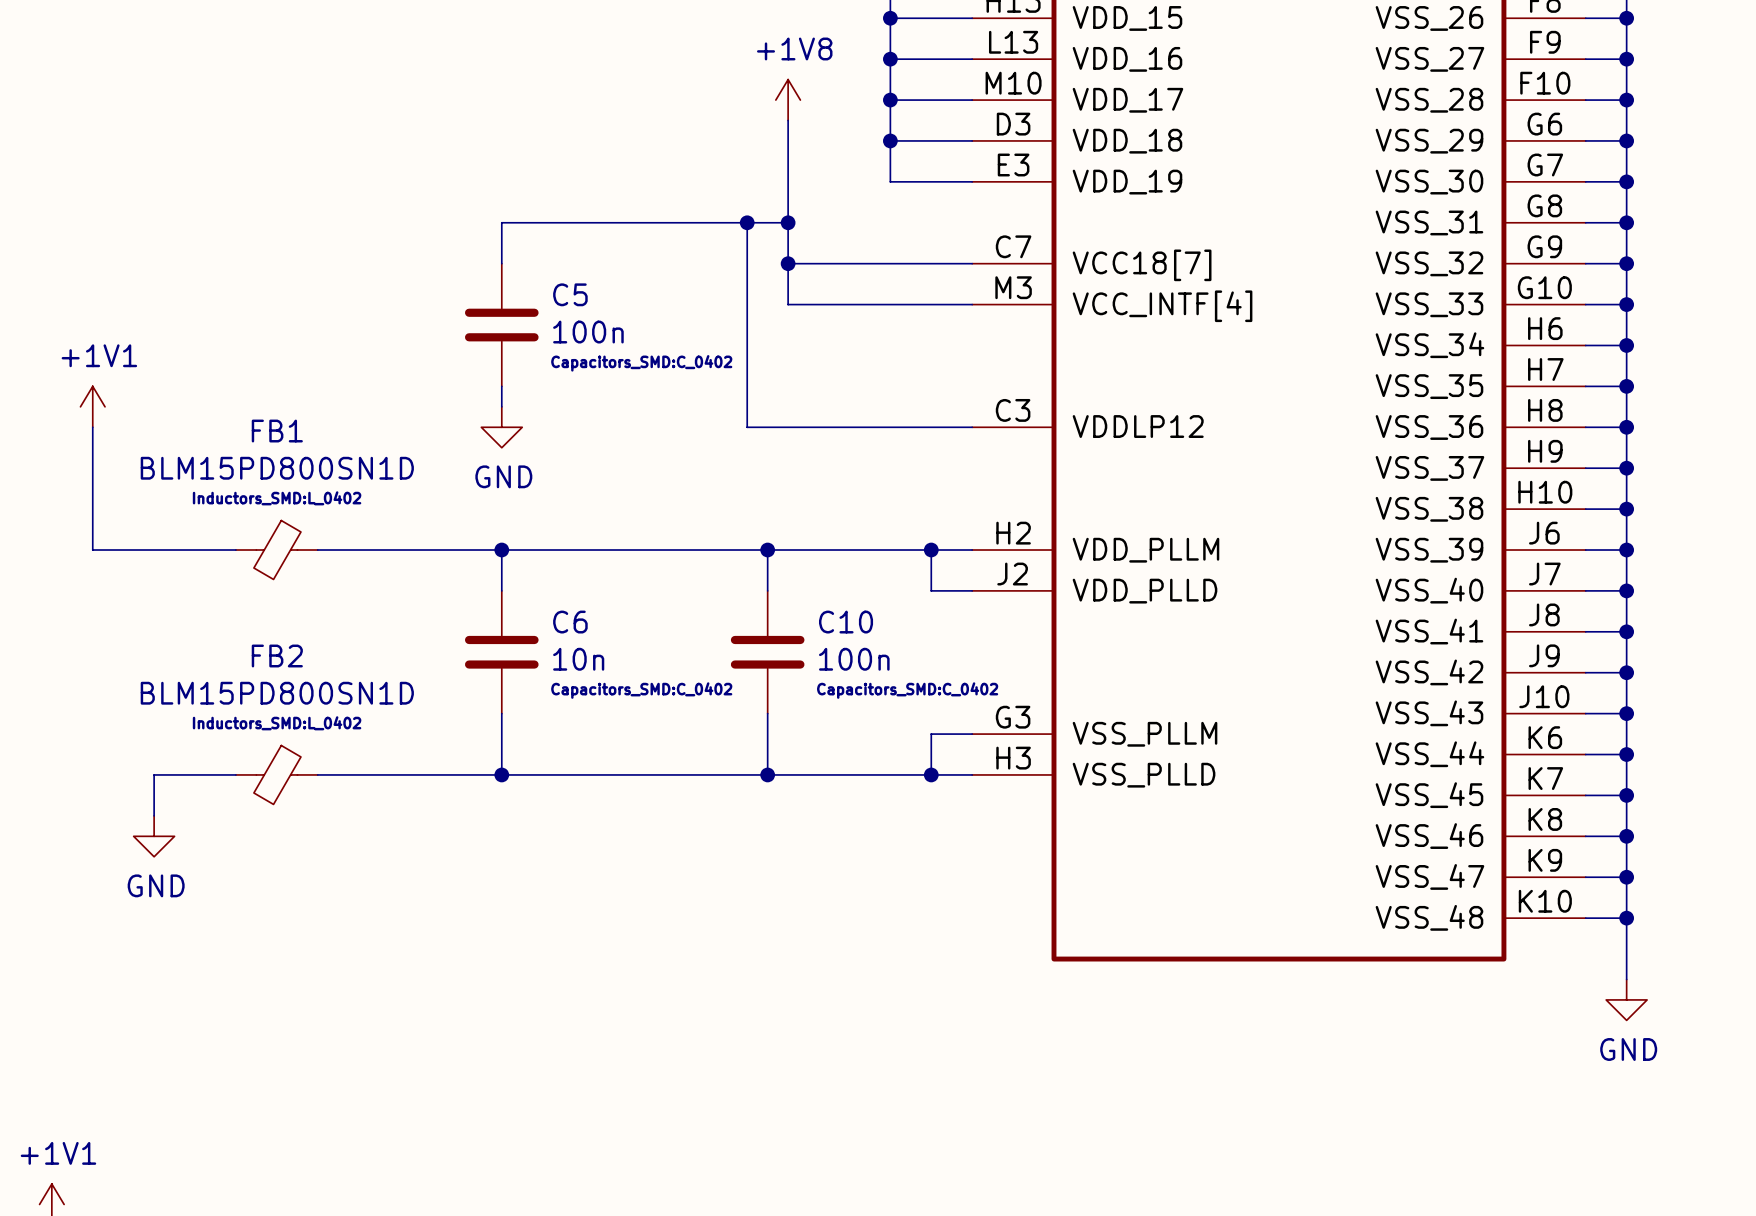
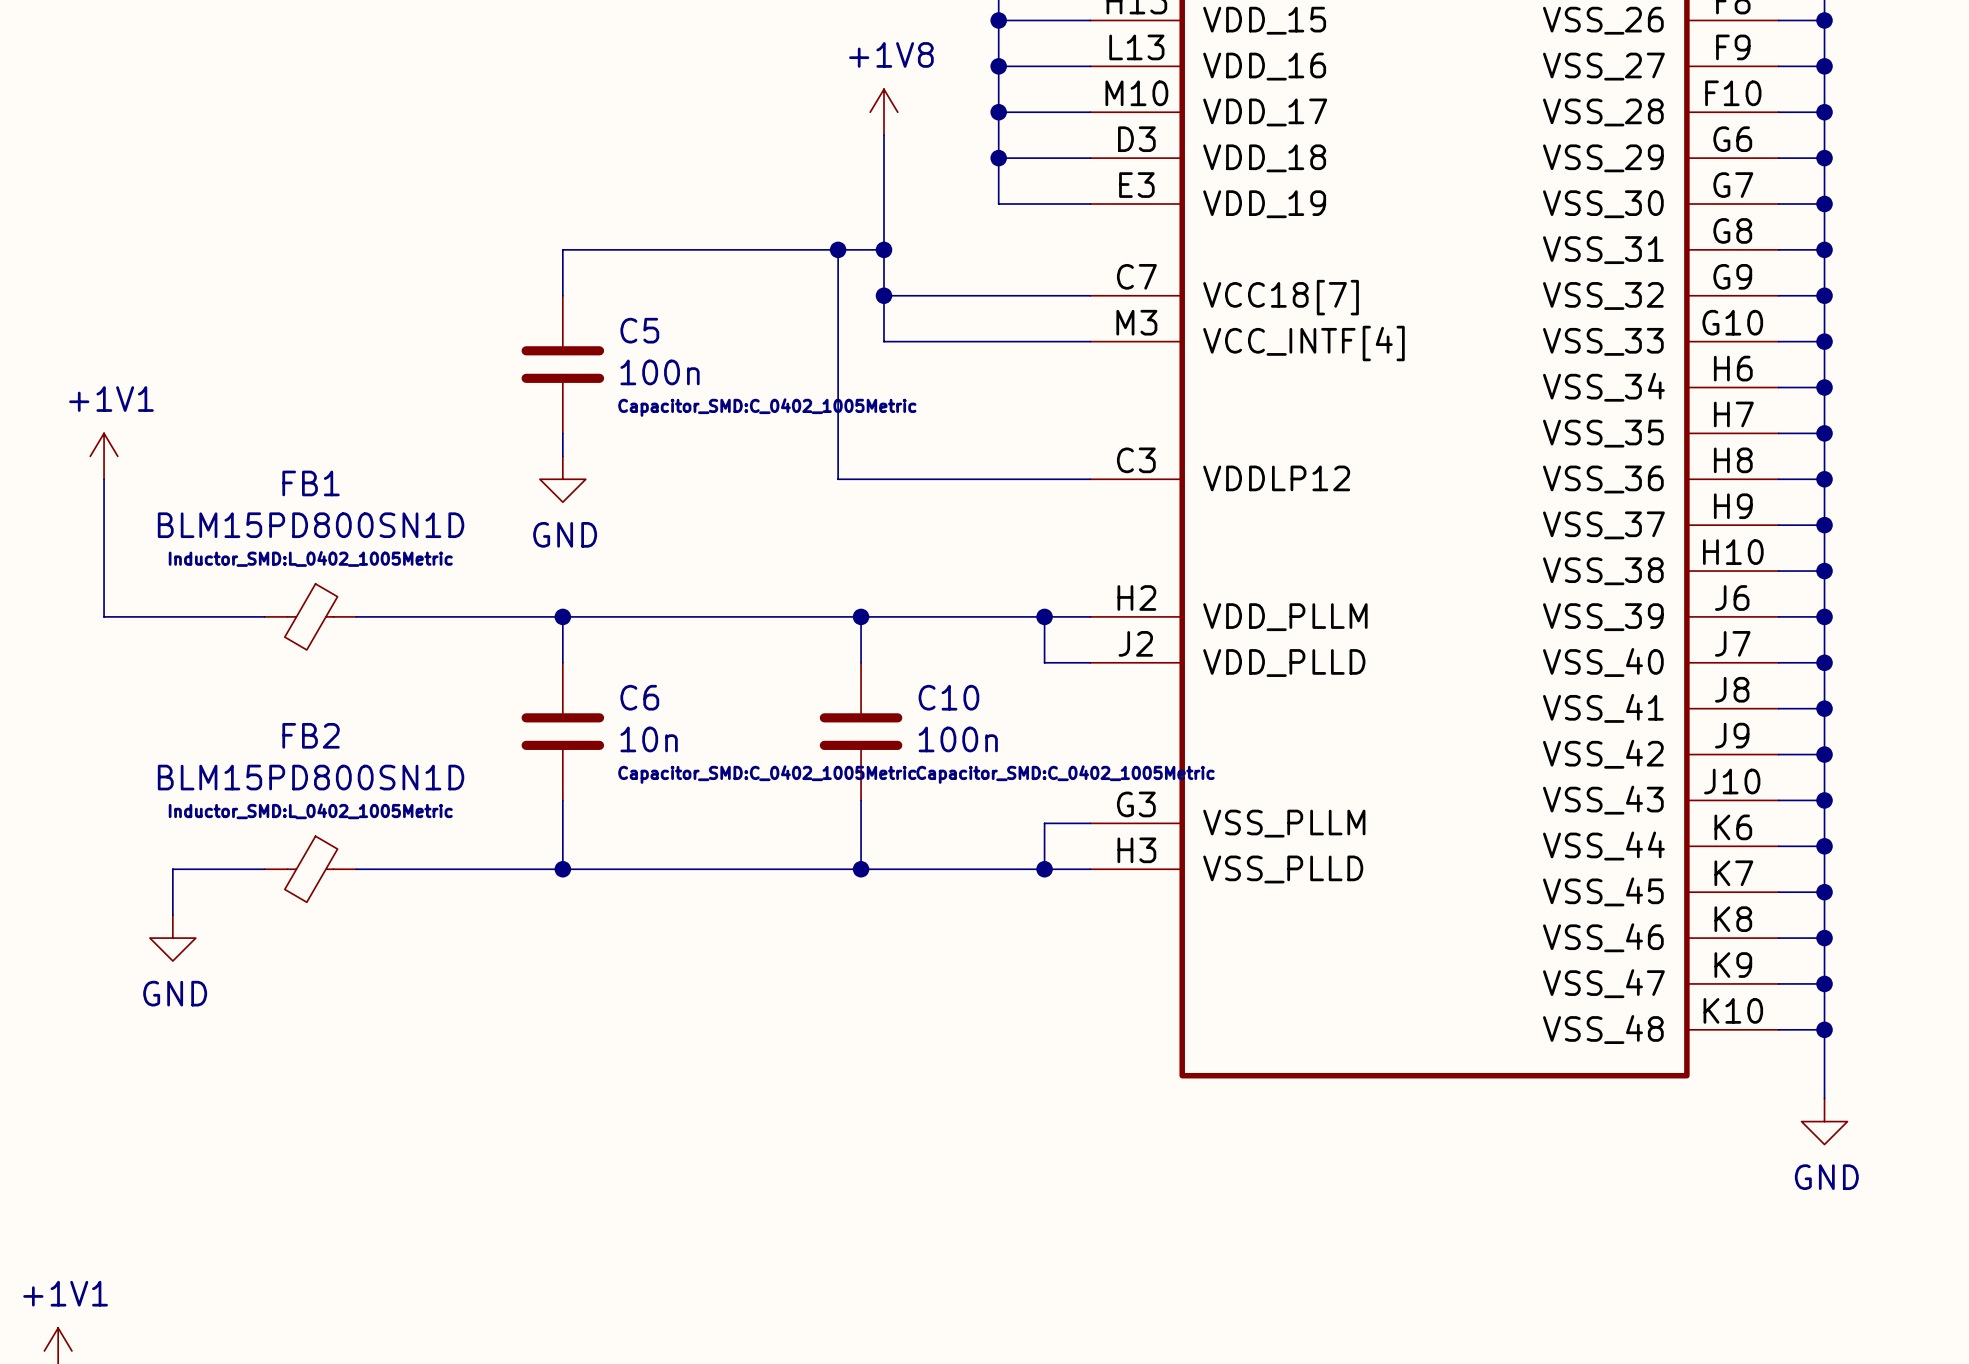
C5 text: Capacitors_SMD:C_0402 (641, 363) -> Capacitor_SMD:C_0402_1005Metric (767, 407)
FB1 text: Inductors_SMD:L_0402 (277, 498) -> Inductor_SMD:L_0402_1005Metric (310, 558)
C6 text: Capacitors_SMD:C_0402 (641, 690) -> Capacitor_SMD:C_0402_1005Metric (767, 774)
C10 text: Capacitors_SMD:C_0402 (907, 690) -> Capacitor_SMD:C_0402_1005Metric (1065, 774)
FB2 text: Inductors_SMD:L_0402 (277, 723) -> Inductor_SMD:L_0402_1005Metric (310, 811)

